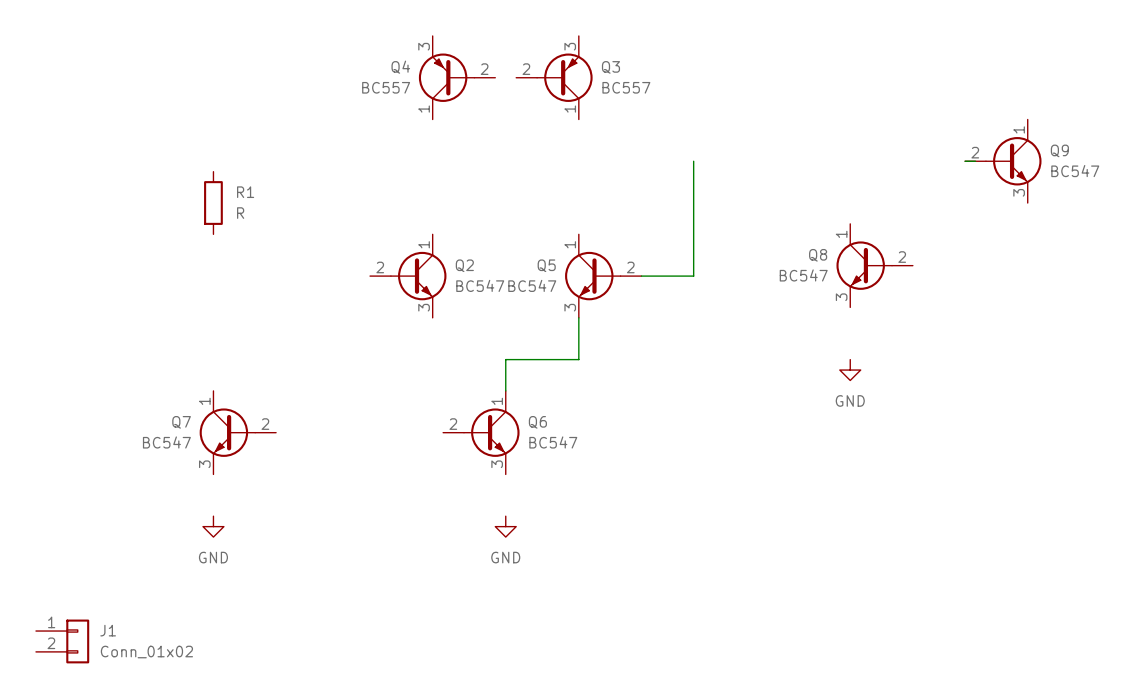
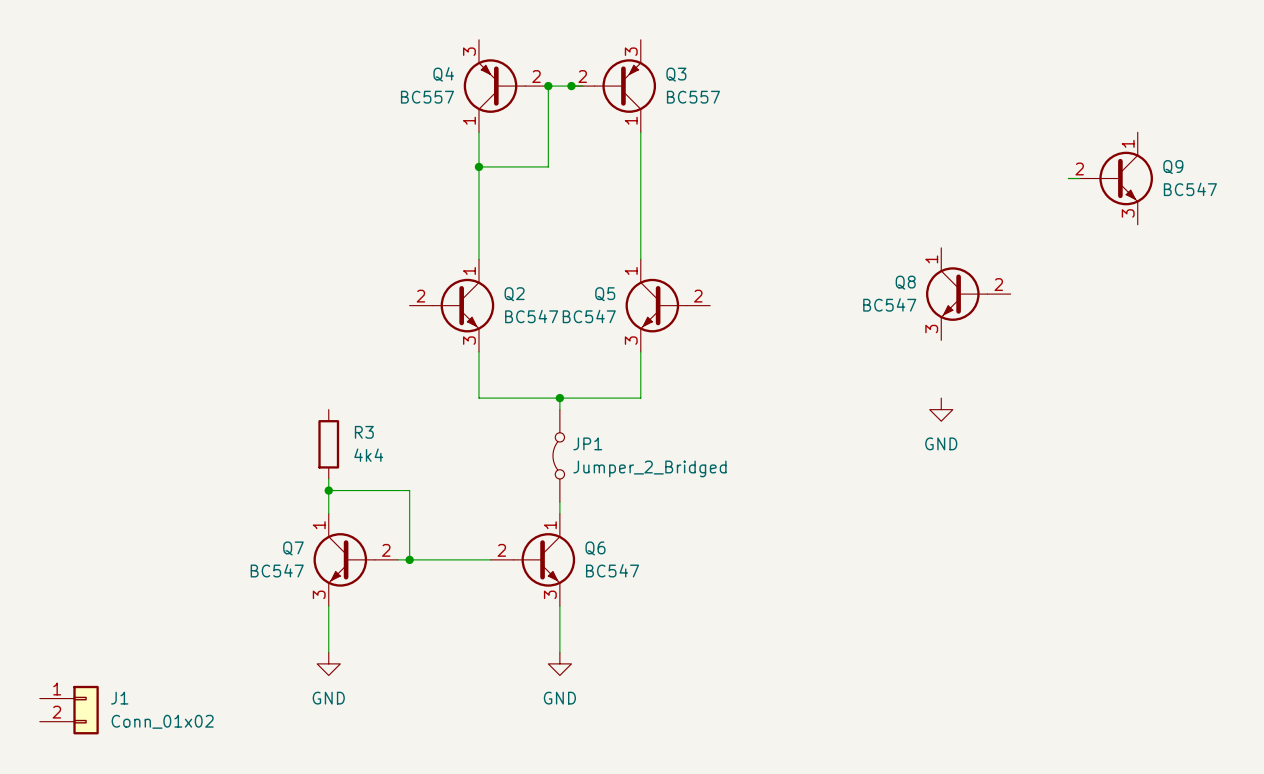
junction: none -> (548, 86)
junction: none -> (571, 86)
wire: none -> (583, 86) (548, 86) (548, 166) (478, 166)
wire: none -> (478, 132) (478, 259)
wire: none -> (640, 132) (640, 259)
junction: none -> (478, 166)
wire: (693, 161) (693, 276) (641, 276) -> none
R1: R (213, 203) -> none
wire: none -> (478, 351) (478, 398) (559, 398)
junction: none -> (559, 398)
R3: none -> 4k4 (328, 444)
JP1: none -> Jumper_2_Bridged (558, 455)
Q7 position: (237, 432) -> (355, 559)
wire: none -> (328, 478) (328, 513)
Q6 position: (481, 432) -> (532, 559)
wire: none -> (328, 490) (409, 490) (409, 559)
junction: none -> (328, 490)
wire: none -> (398, 559) (490, 559)
junction: none -> (409, 559)
power symbol: GND (213, 526) -> none
power symbol position: GND (505, 526) -> GND (559, 663)
wire: none -> (328, 606) (328, 652)
wire: none -> (559, 606) (559, 652)
power symbol: none -> GND (328, 663)

